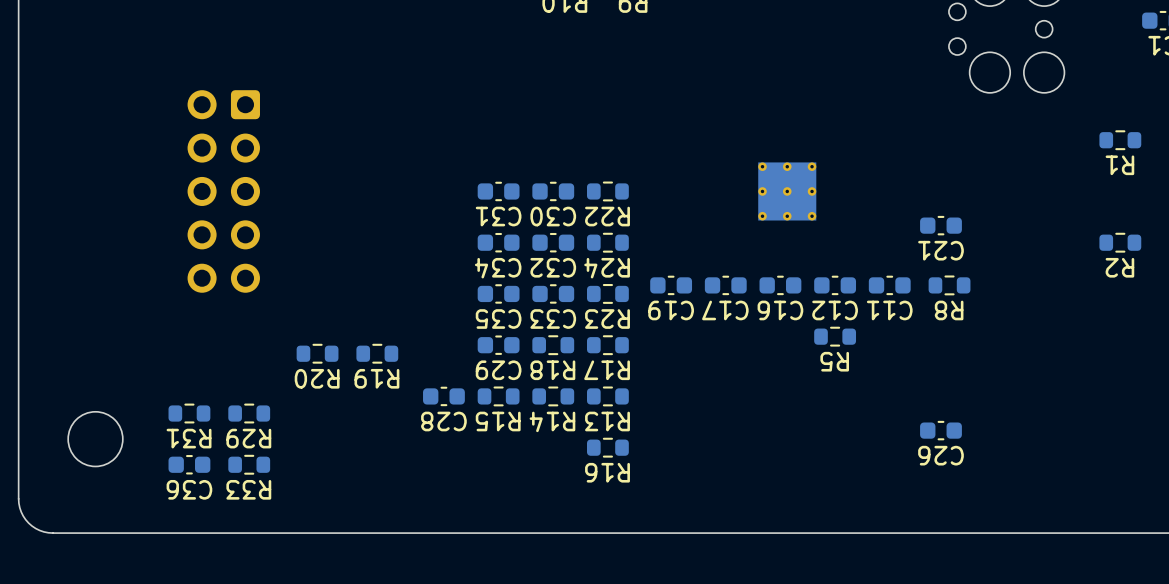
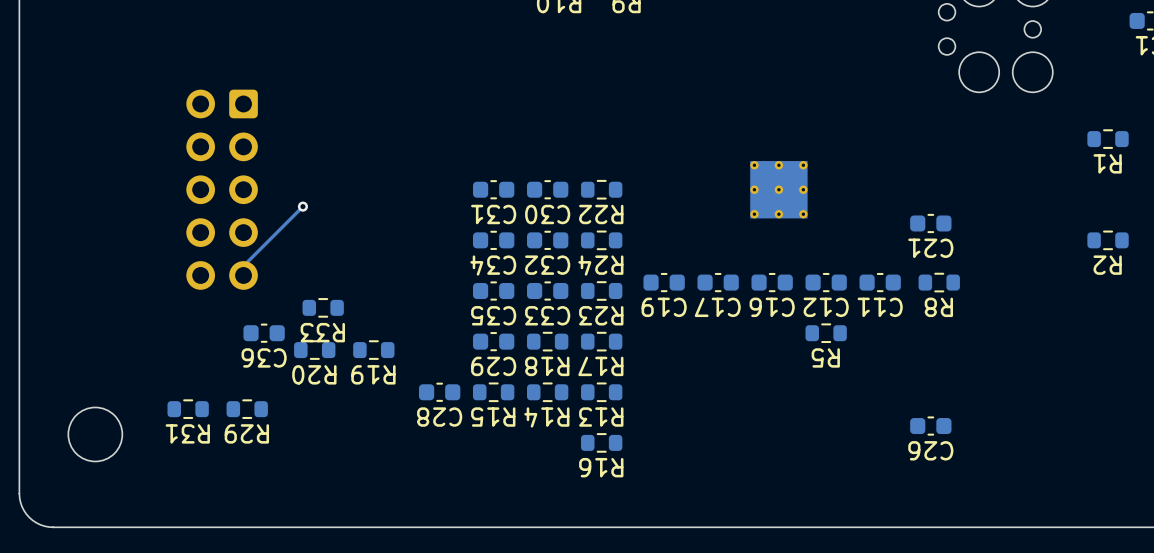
track: none -> (302, 206) (243, 266) (243, 275)
via: none -> (302, 206)
C36 position: (189, 464) -> (264, 333)
R33 position: (249, 464) -> (323, 307)

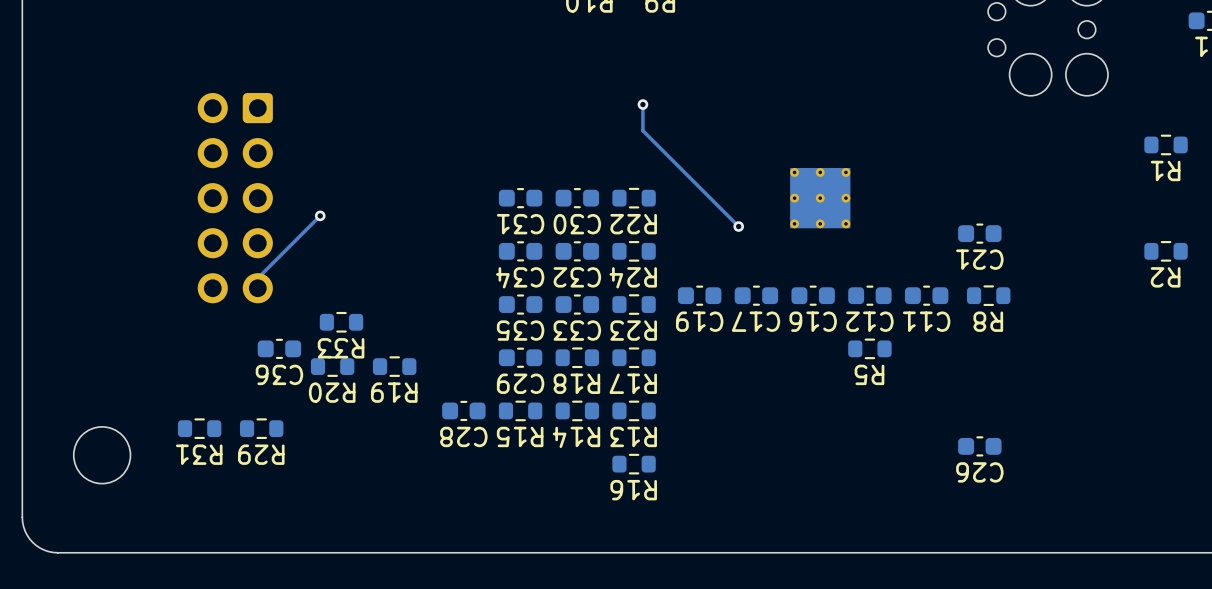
track: none -> (642, 104) (642, 130) (738, 226)
via: none -> (642, 104)
via: none -> (738, 226)

